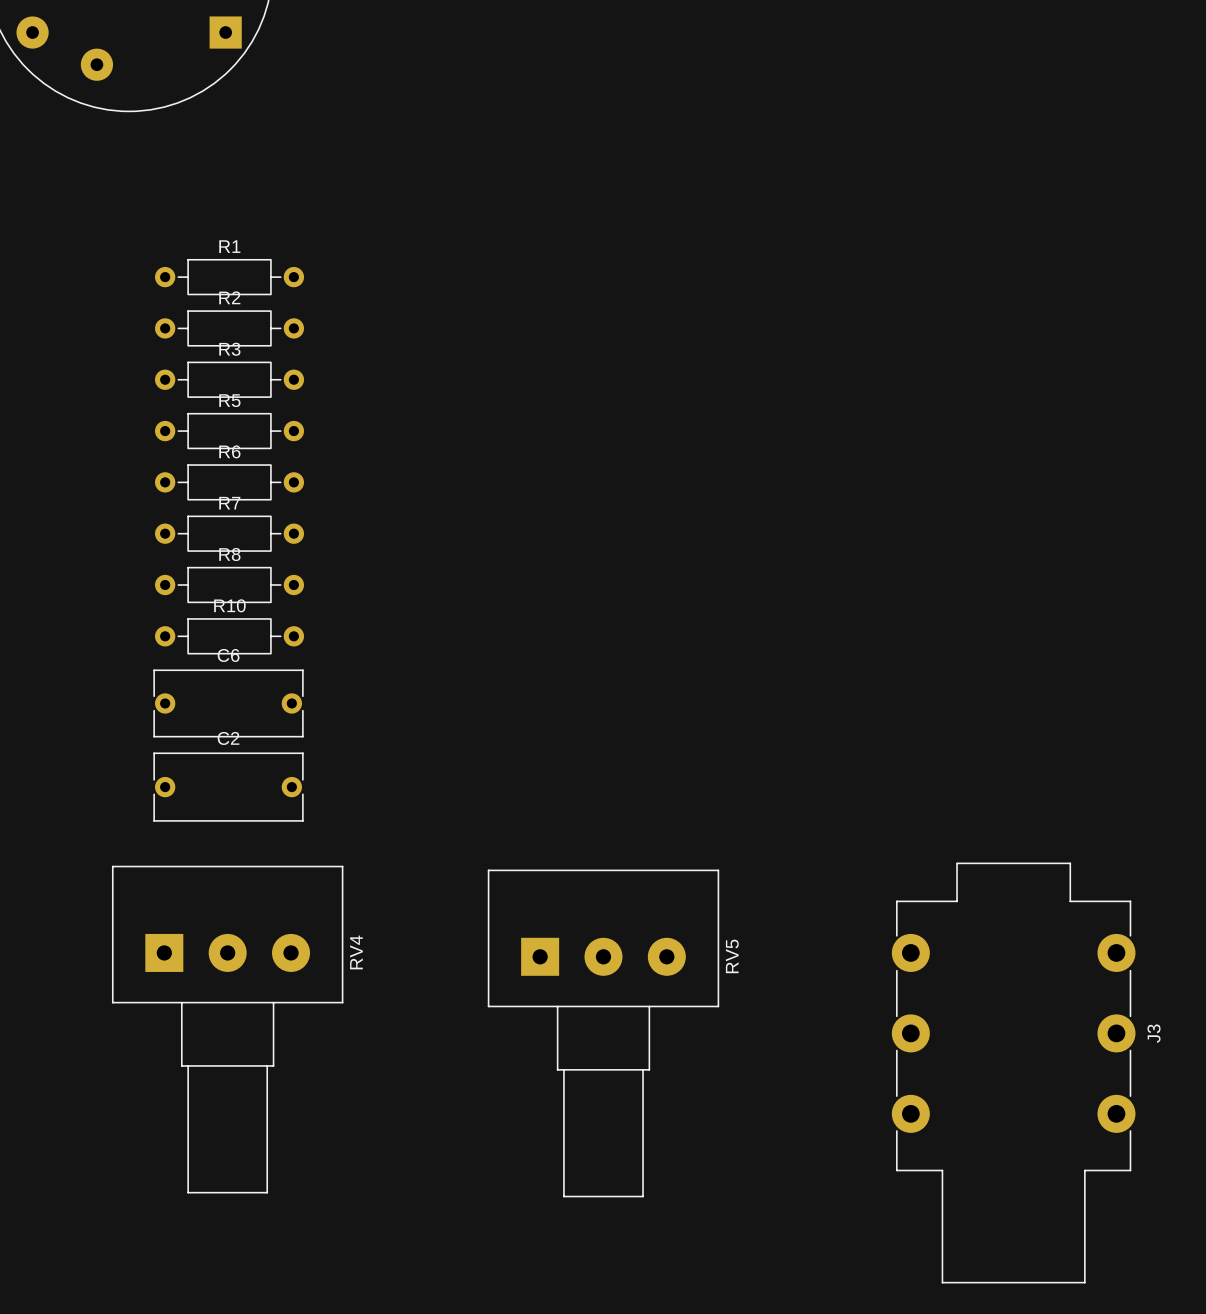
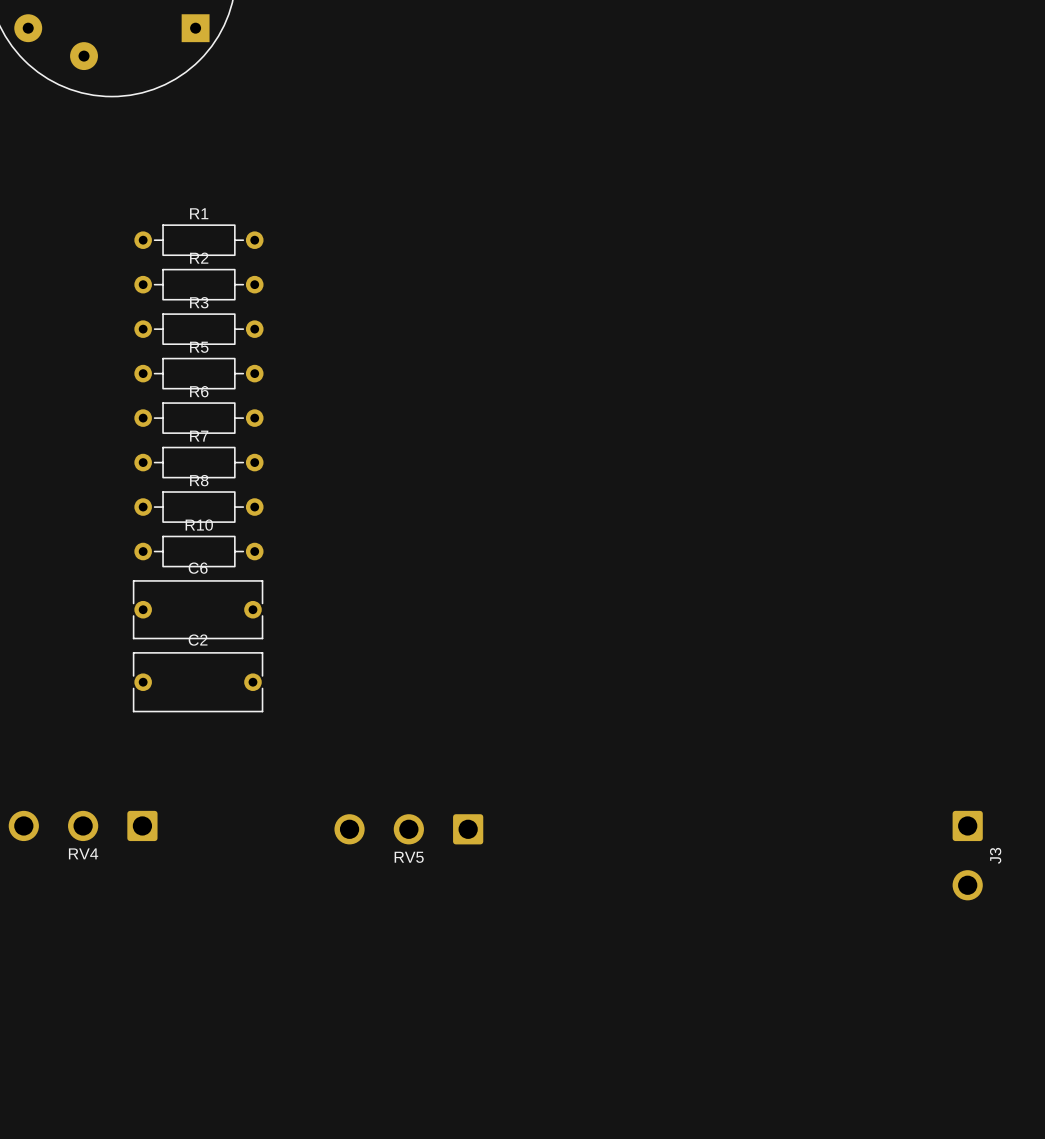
J3 footprint: [891, 862, 1136, 1284] -> [952, 810, 983, 901]
RV4 footprint: [112, 865, 344, 1194] -> [8, 810, 158, 842]
RV5 footprint: [487, 869, 720, 1198] -> [334, 814, 484, 845]
RV4 name position: RV4 (356, 952) -> RV4 (83, 853)
RV5 name position: RV5 (732, 956) -> RV5 (409, 857)
J3 name position: J3 (1154, 1033) -> J3 (995, 855)

